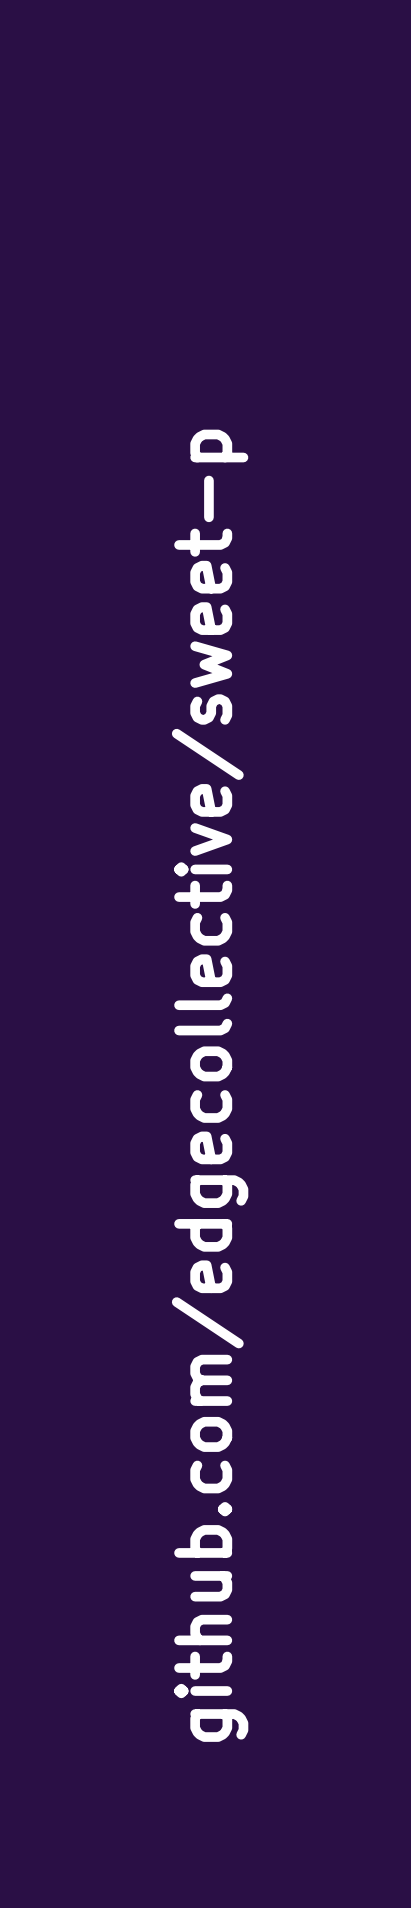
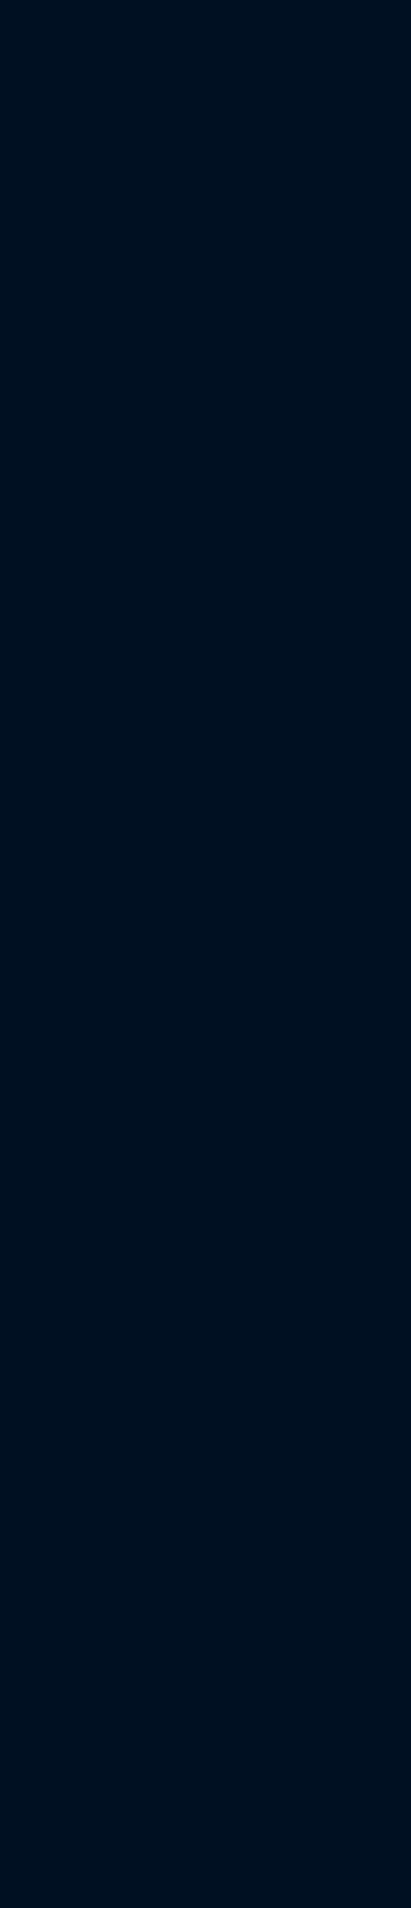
text: github.com/edgecollective/sweet-p (210, 1085) -> none

